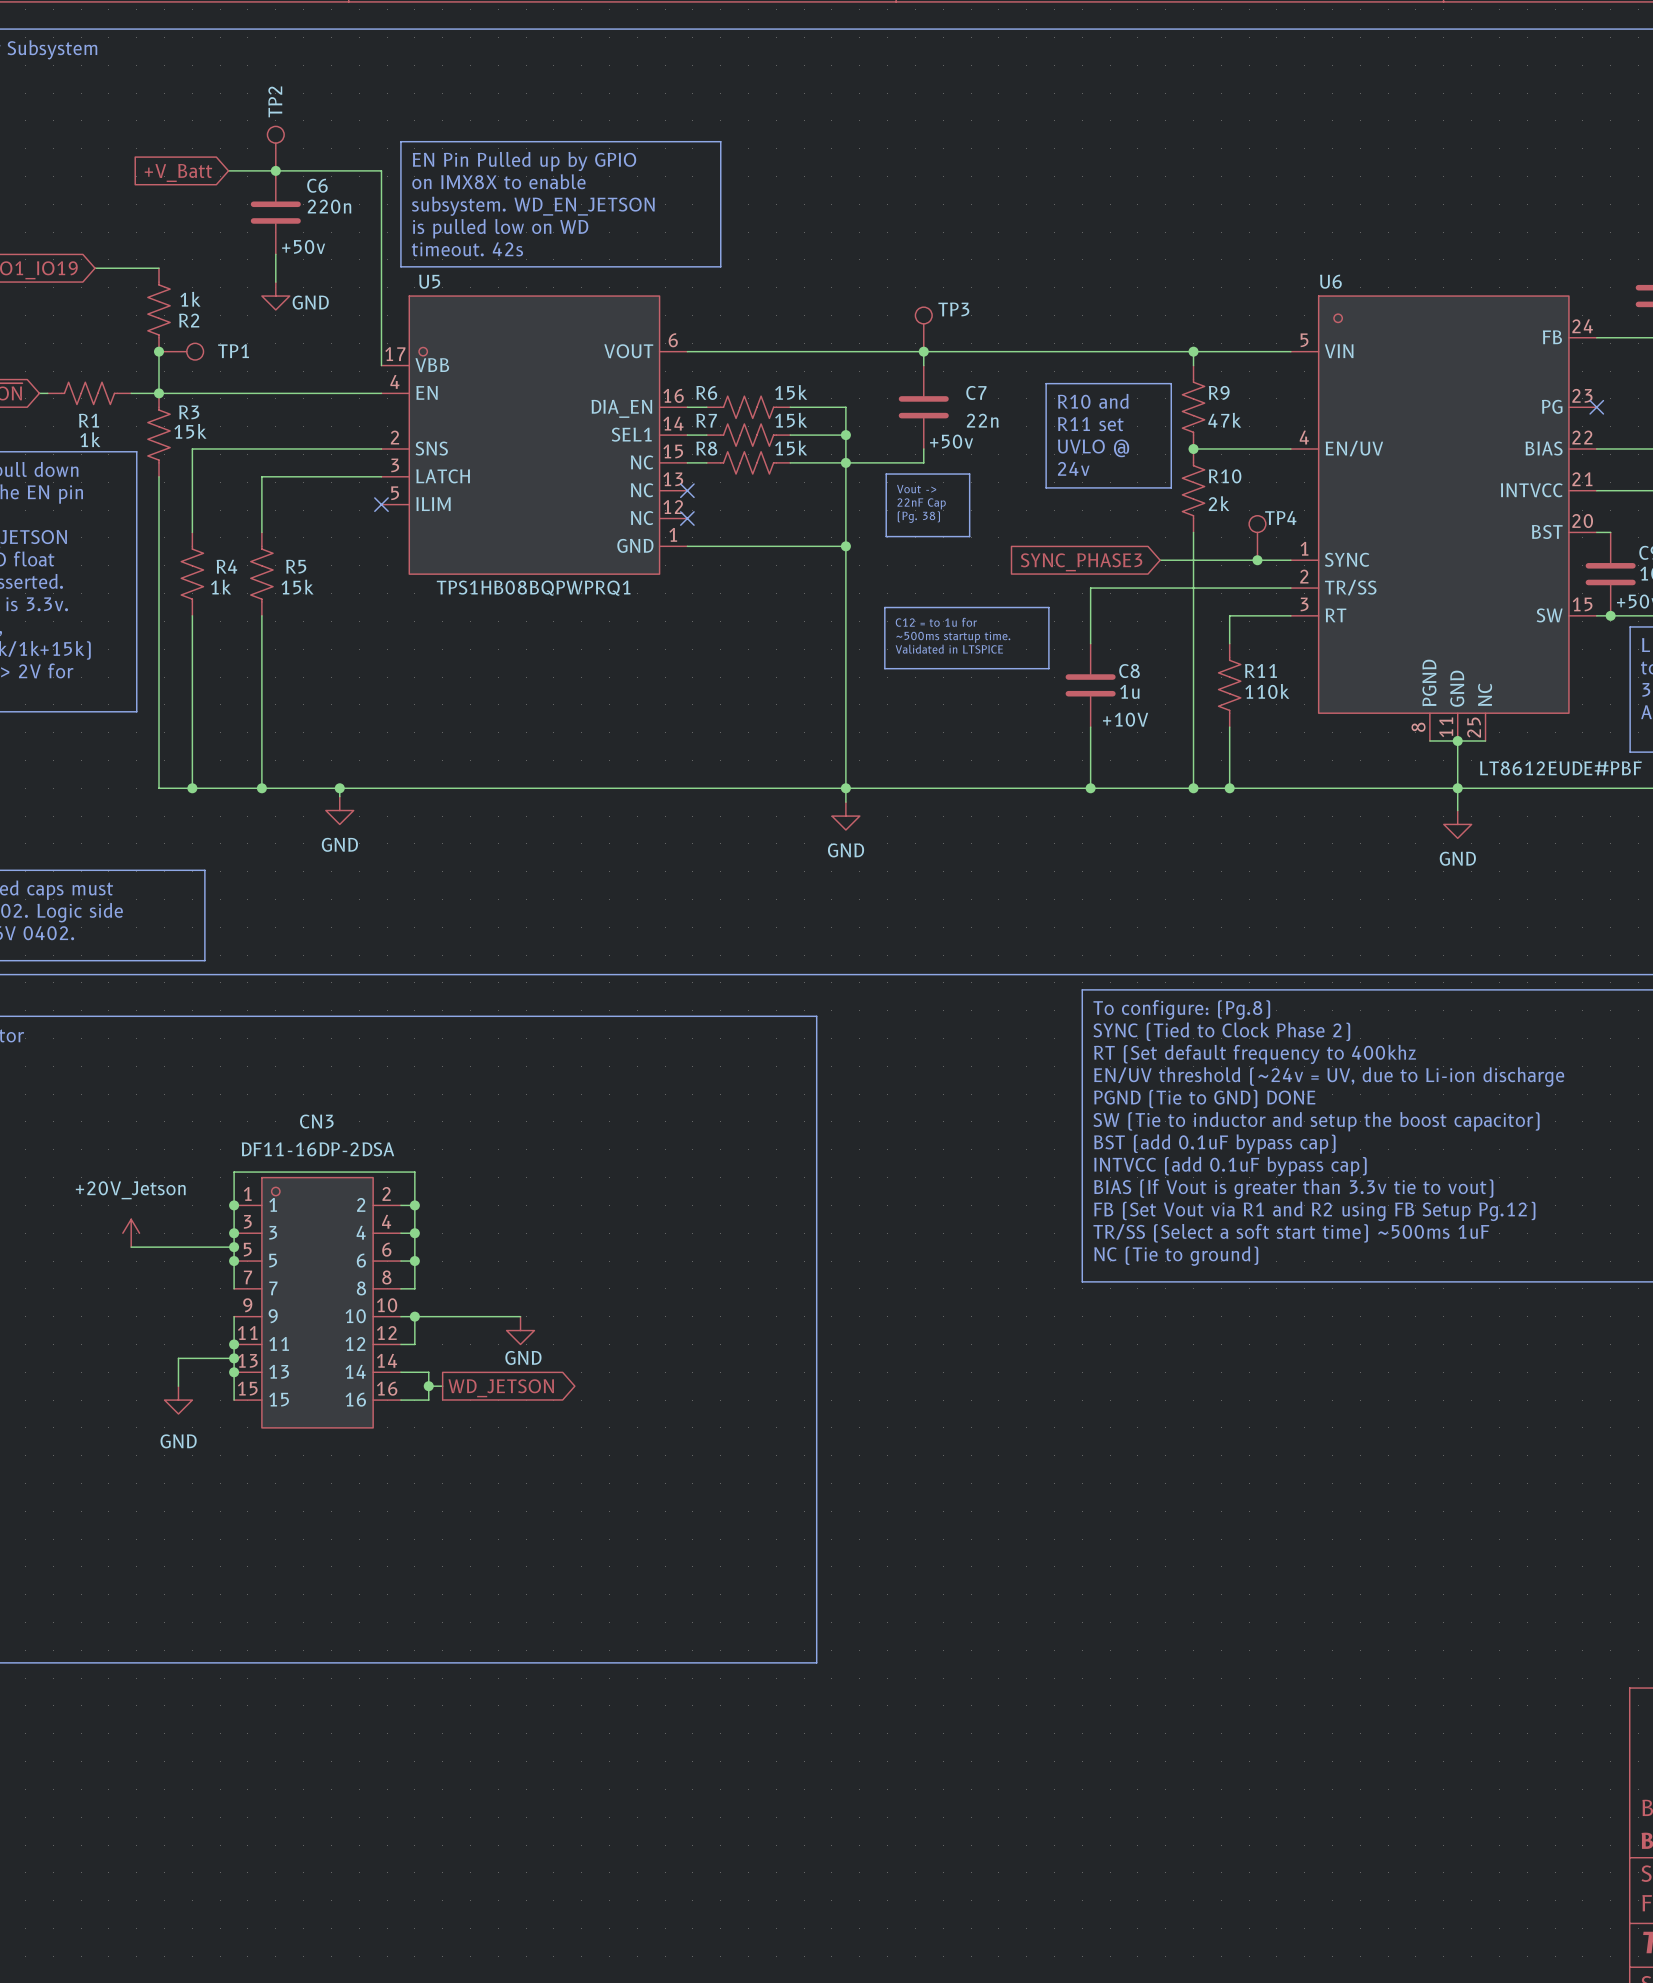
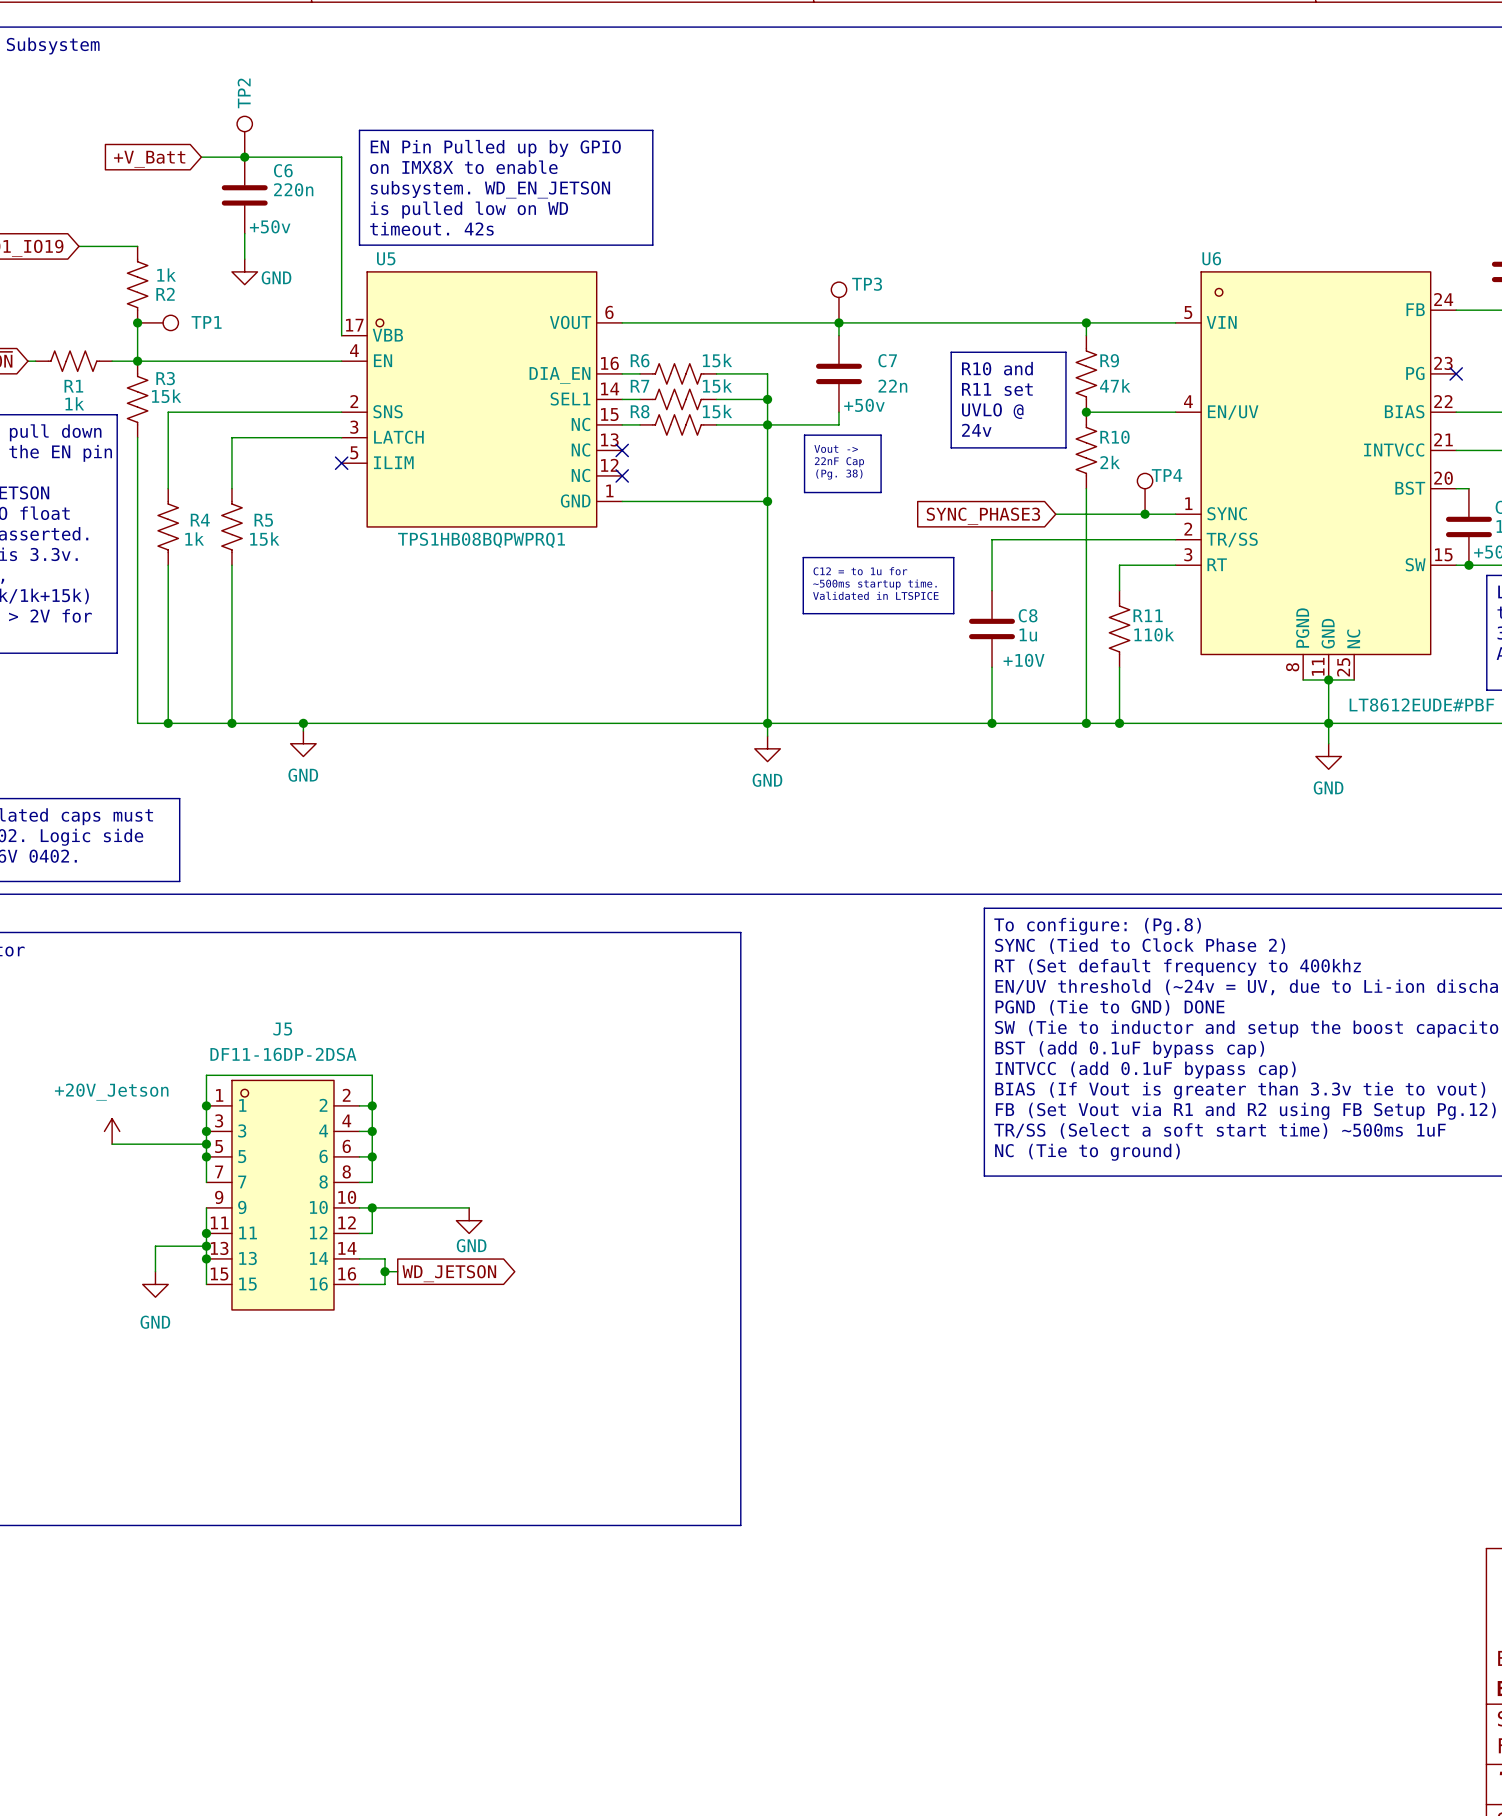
CN3 name: CN3 (316, 1121) -> J5 (282, 1029)

